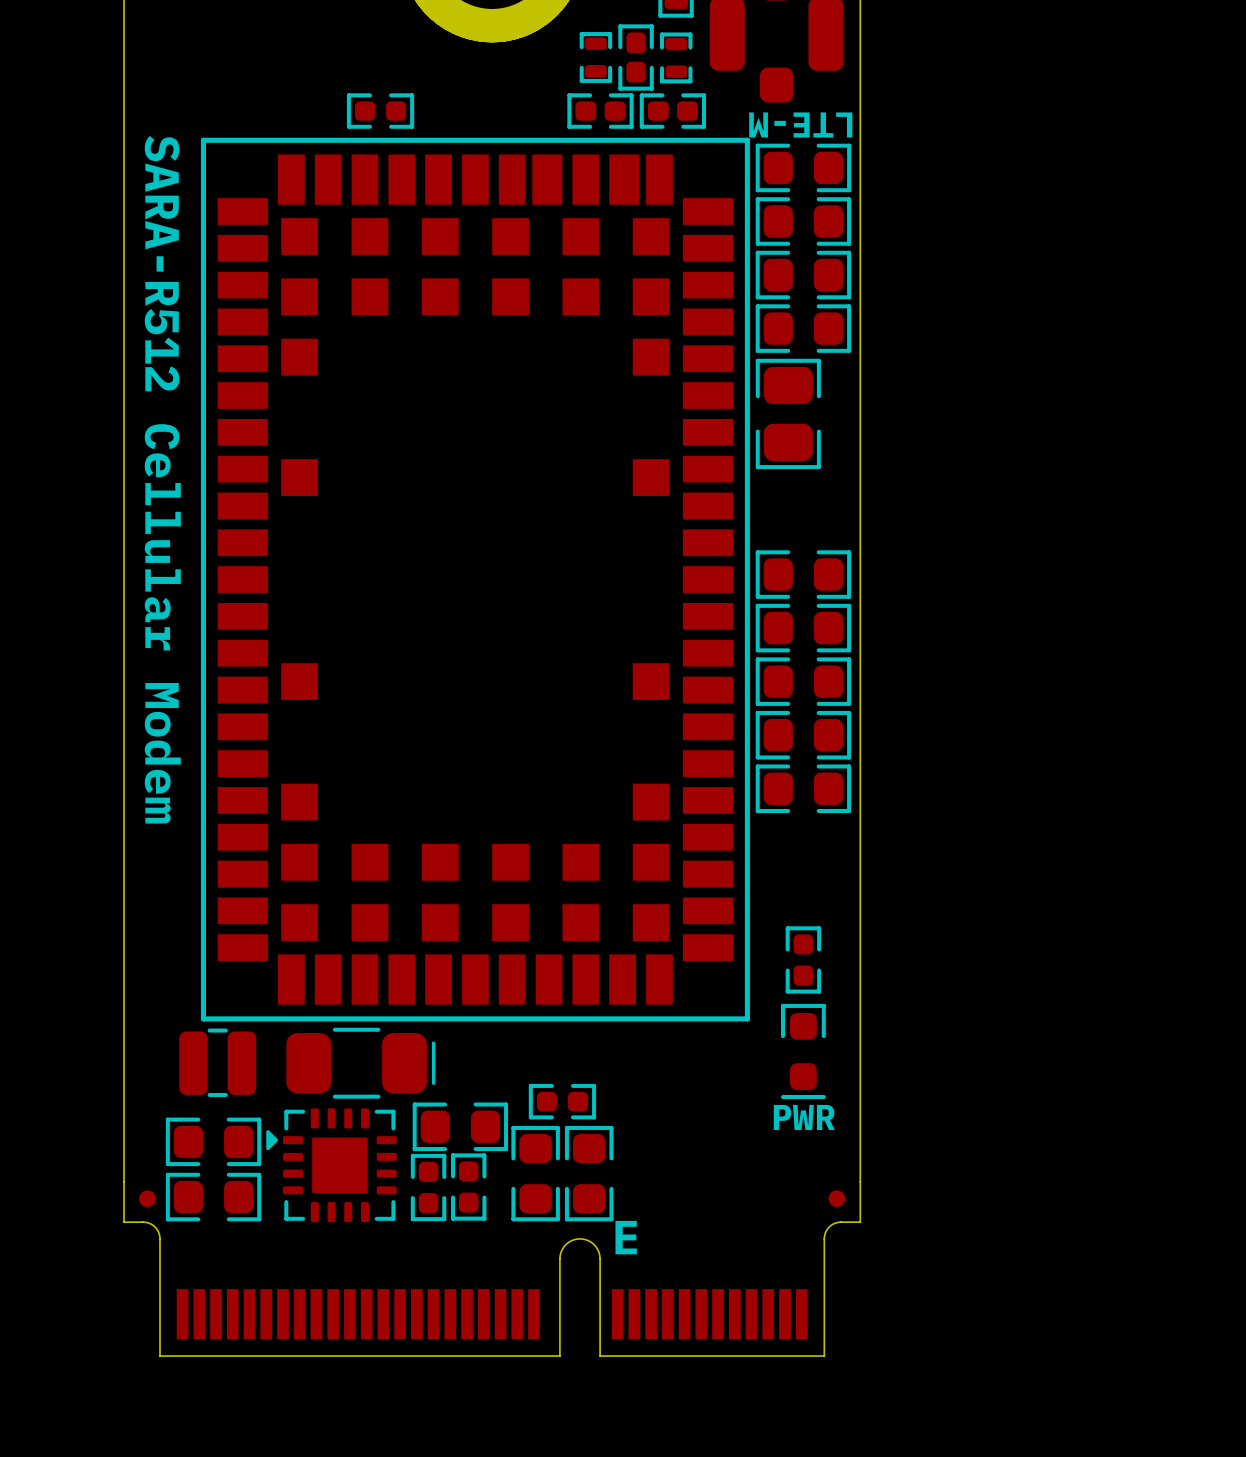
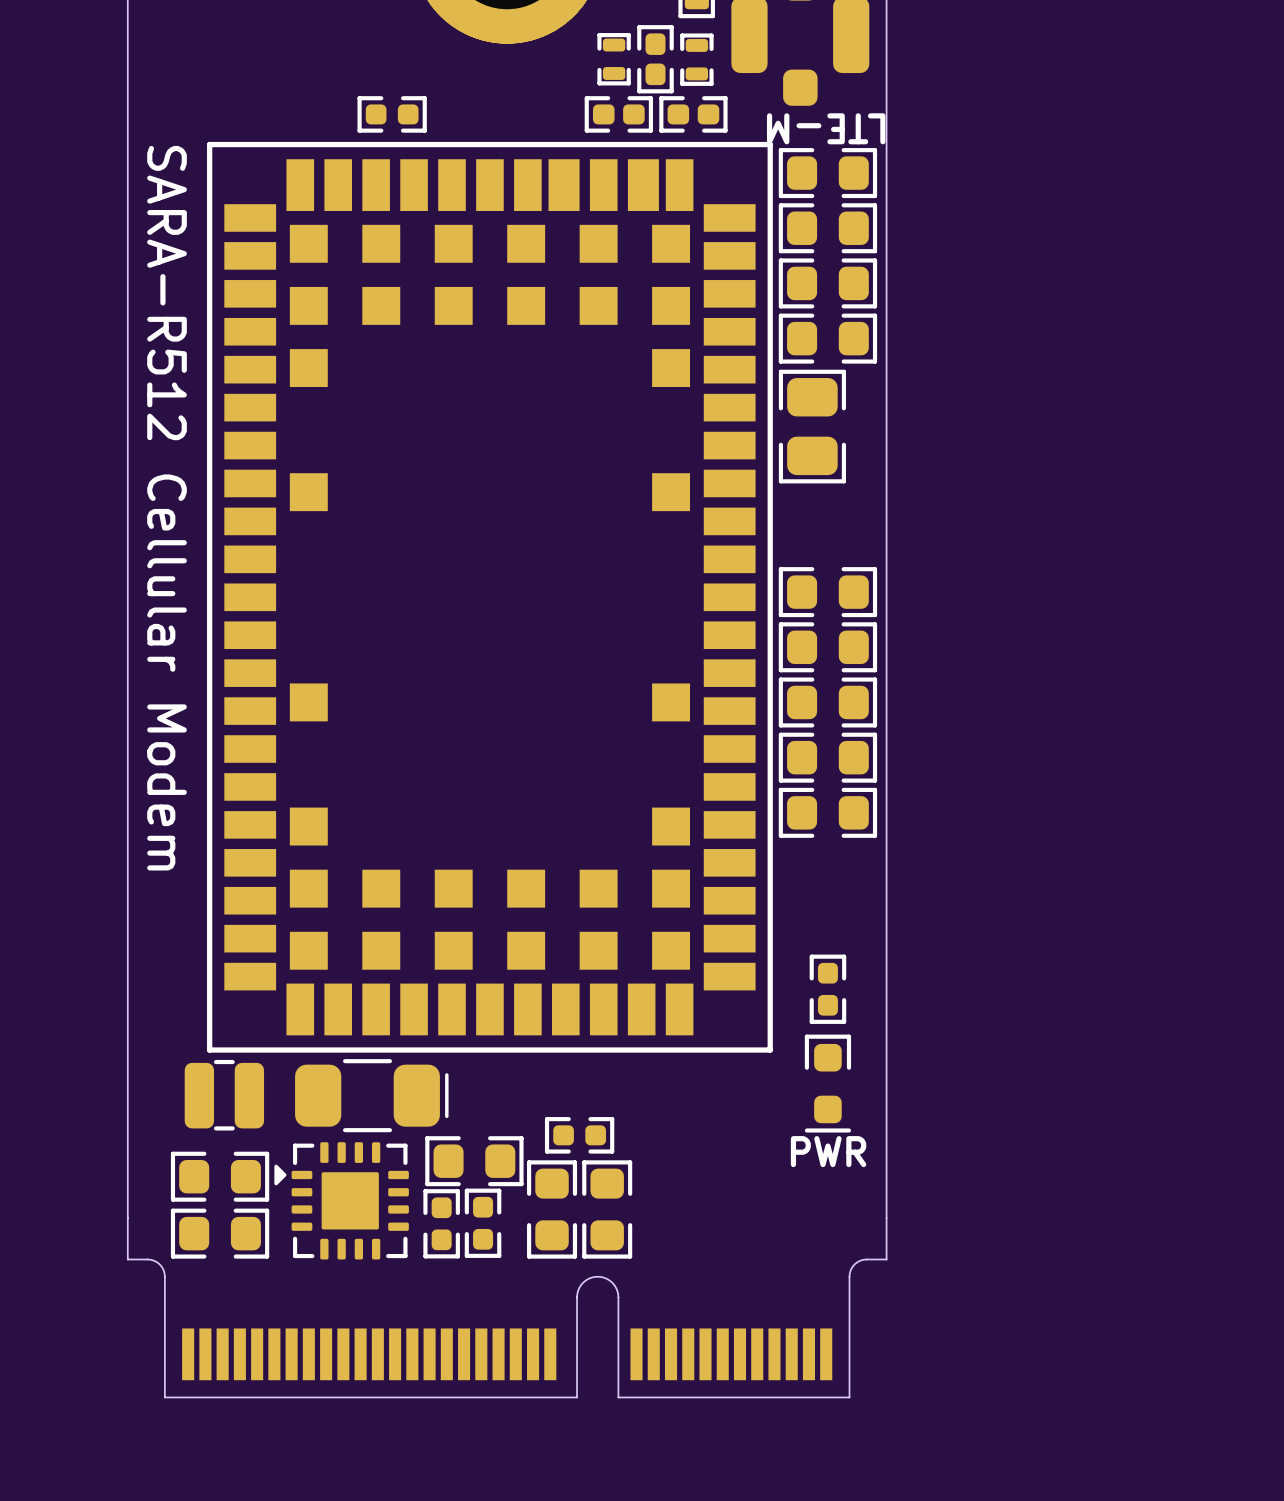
part: (147, 1198) -> none
part: (836, 1198) -> none
text: E (626, 1237) -> none

